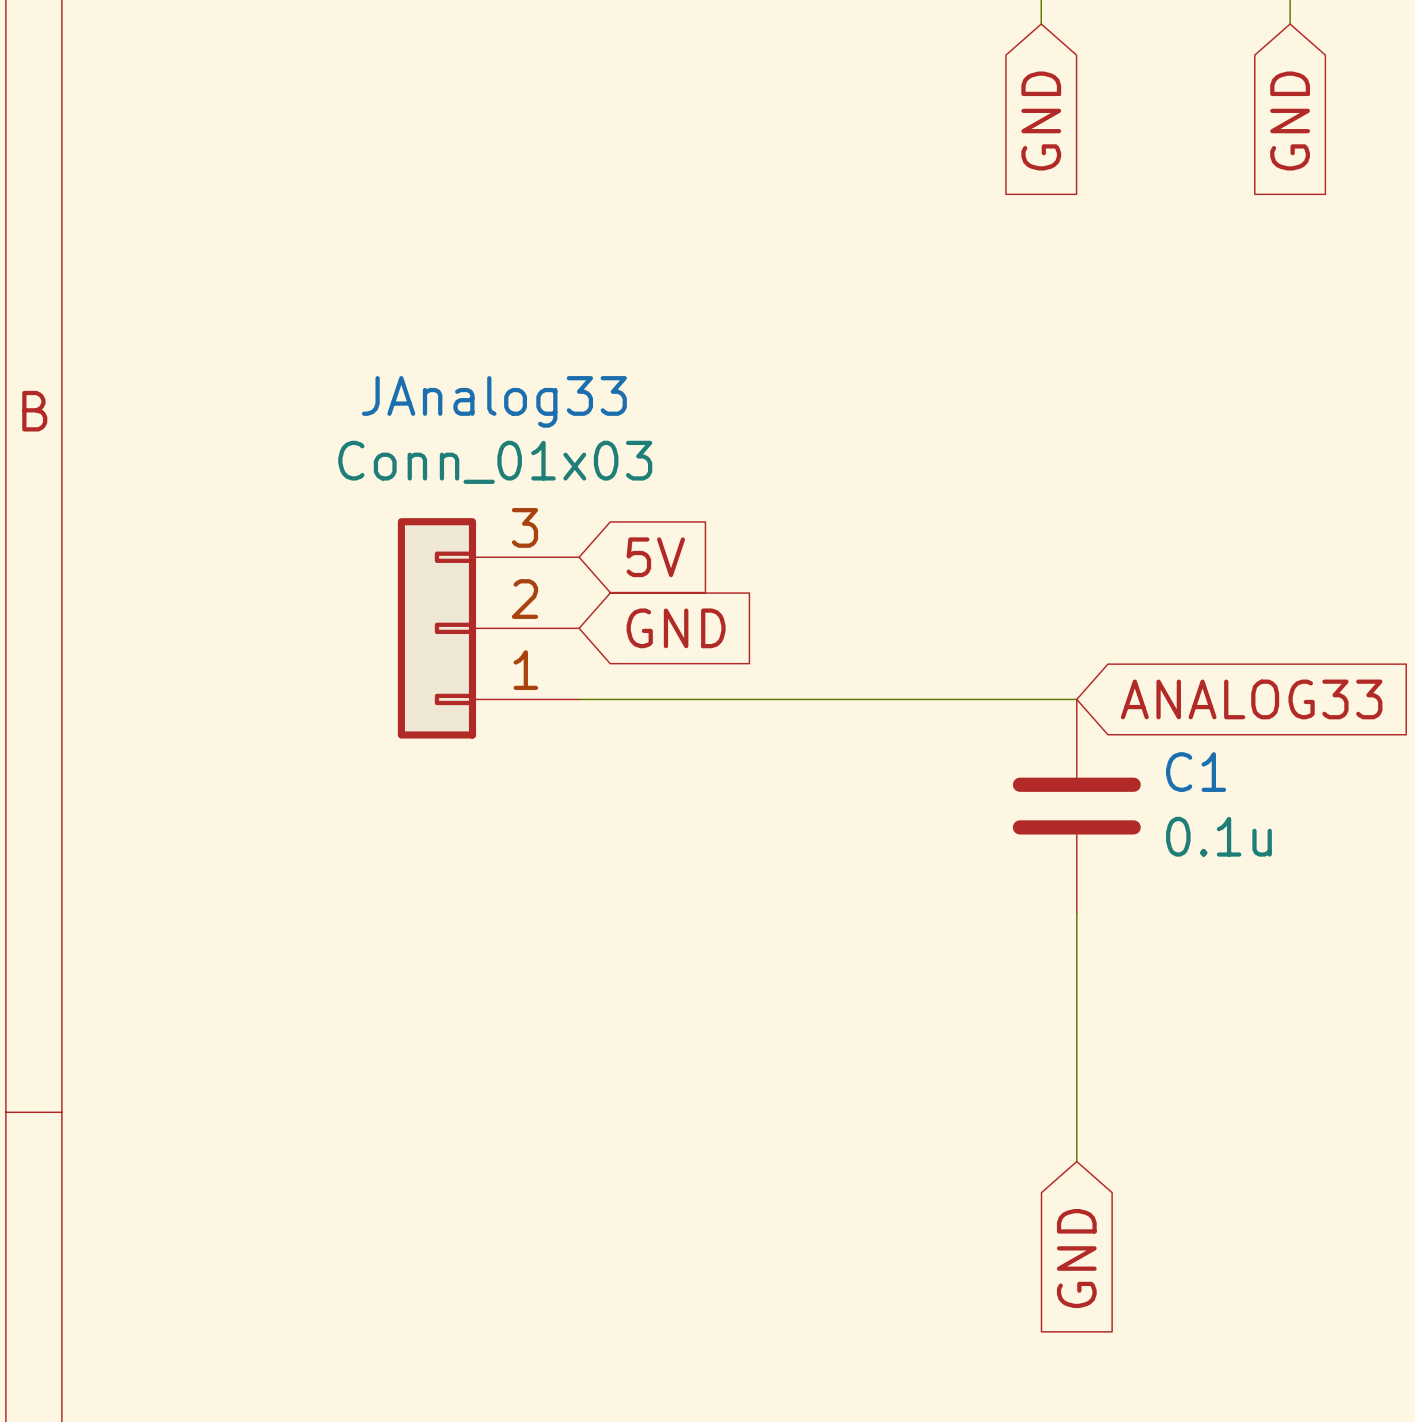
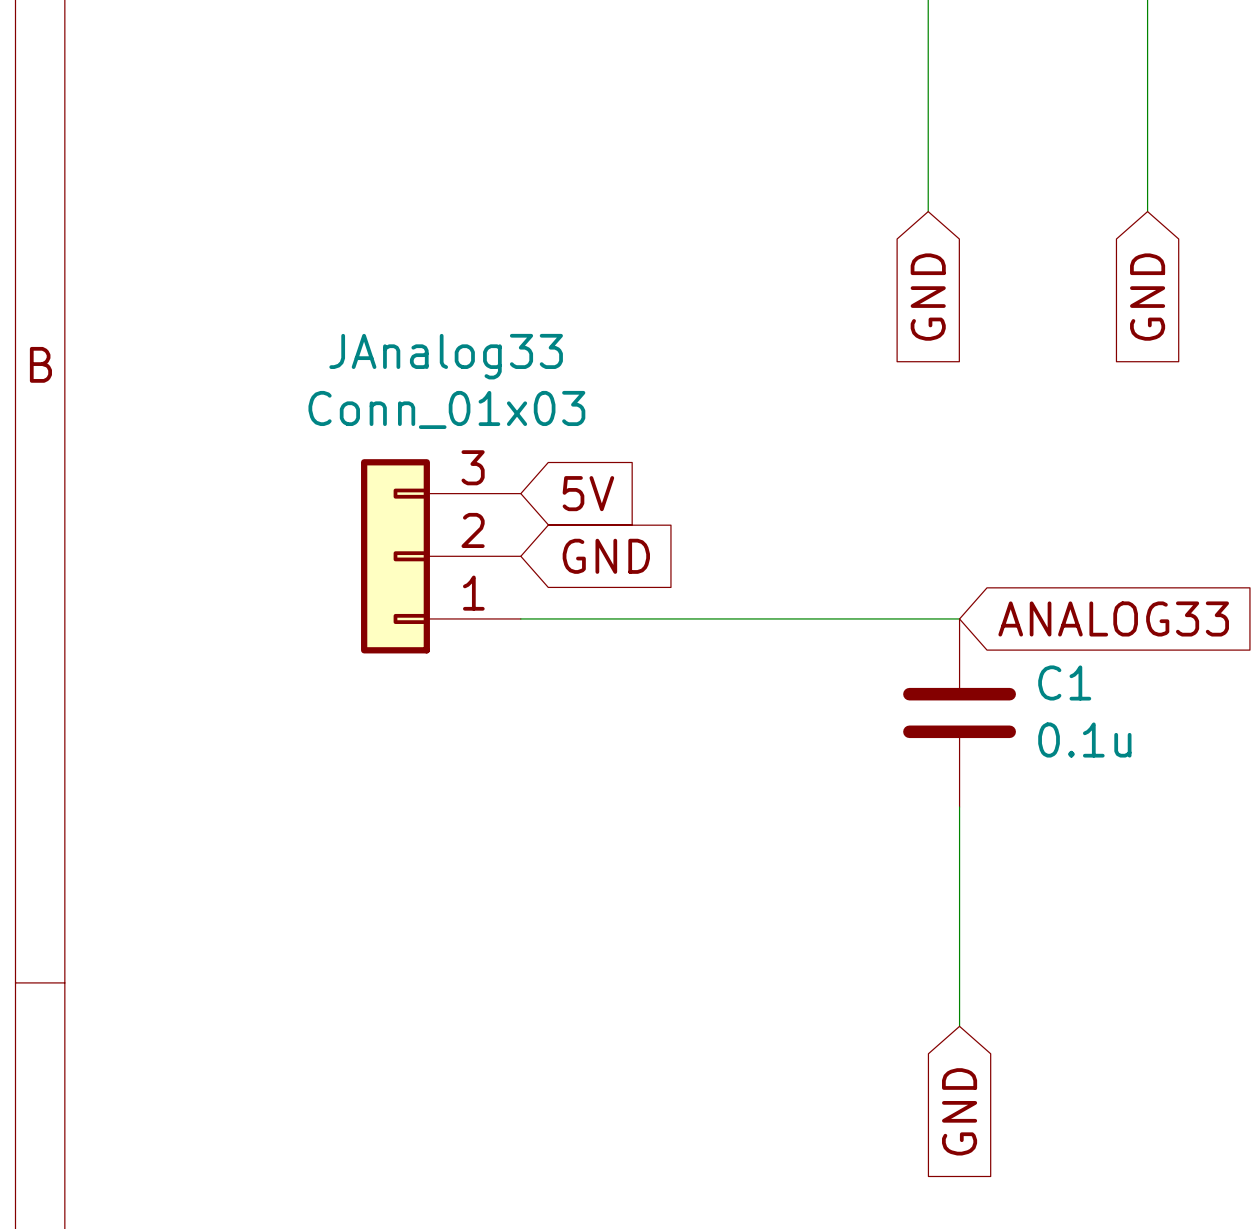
wire: none -> (928, 23) (928, 211)
wire: none -> (1147, 23) (1147, 211)
global label position: GND (1041, 121) -> GND (928, 297)
global label position: GND (1290, 121) -> GND (1147, 297)

